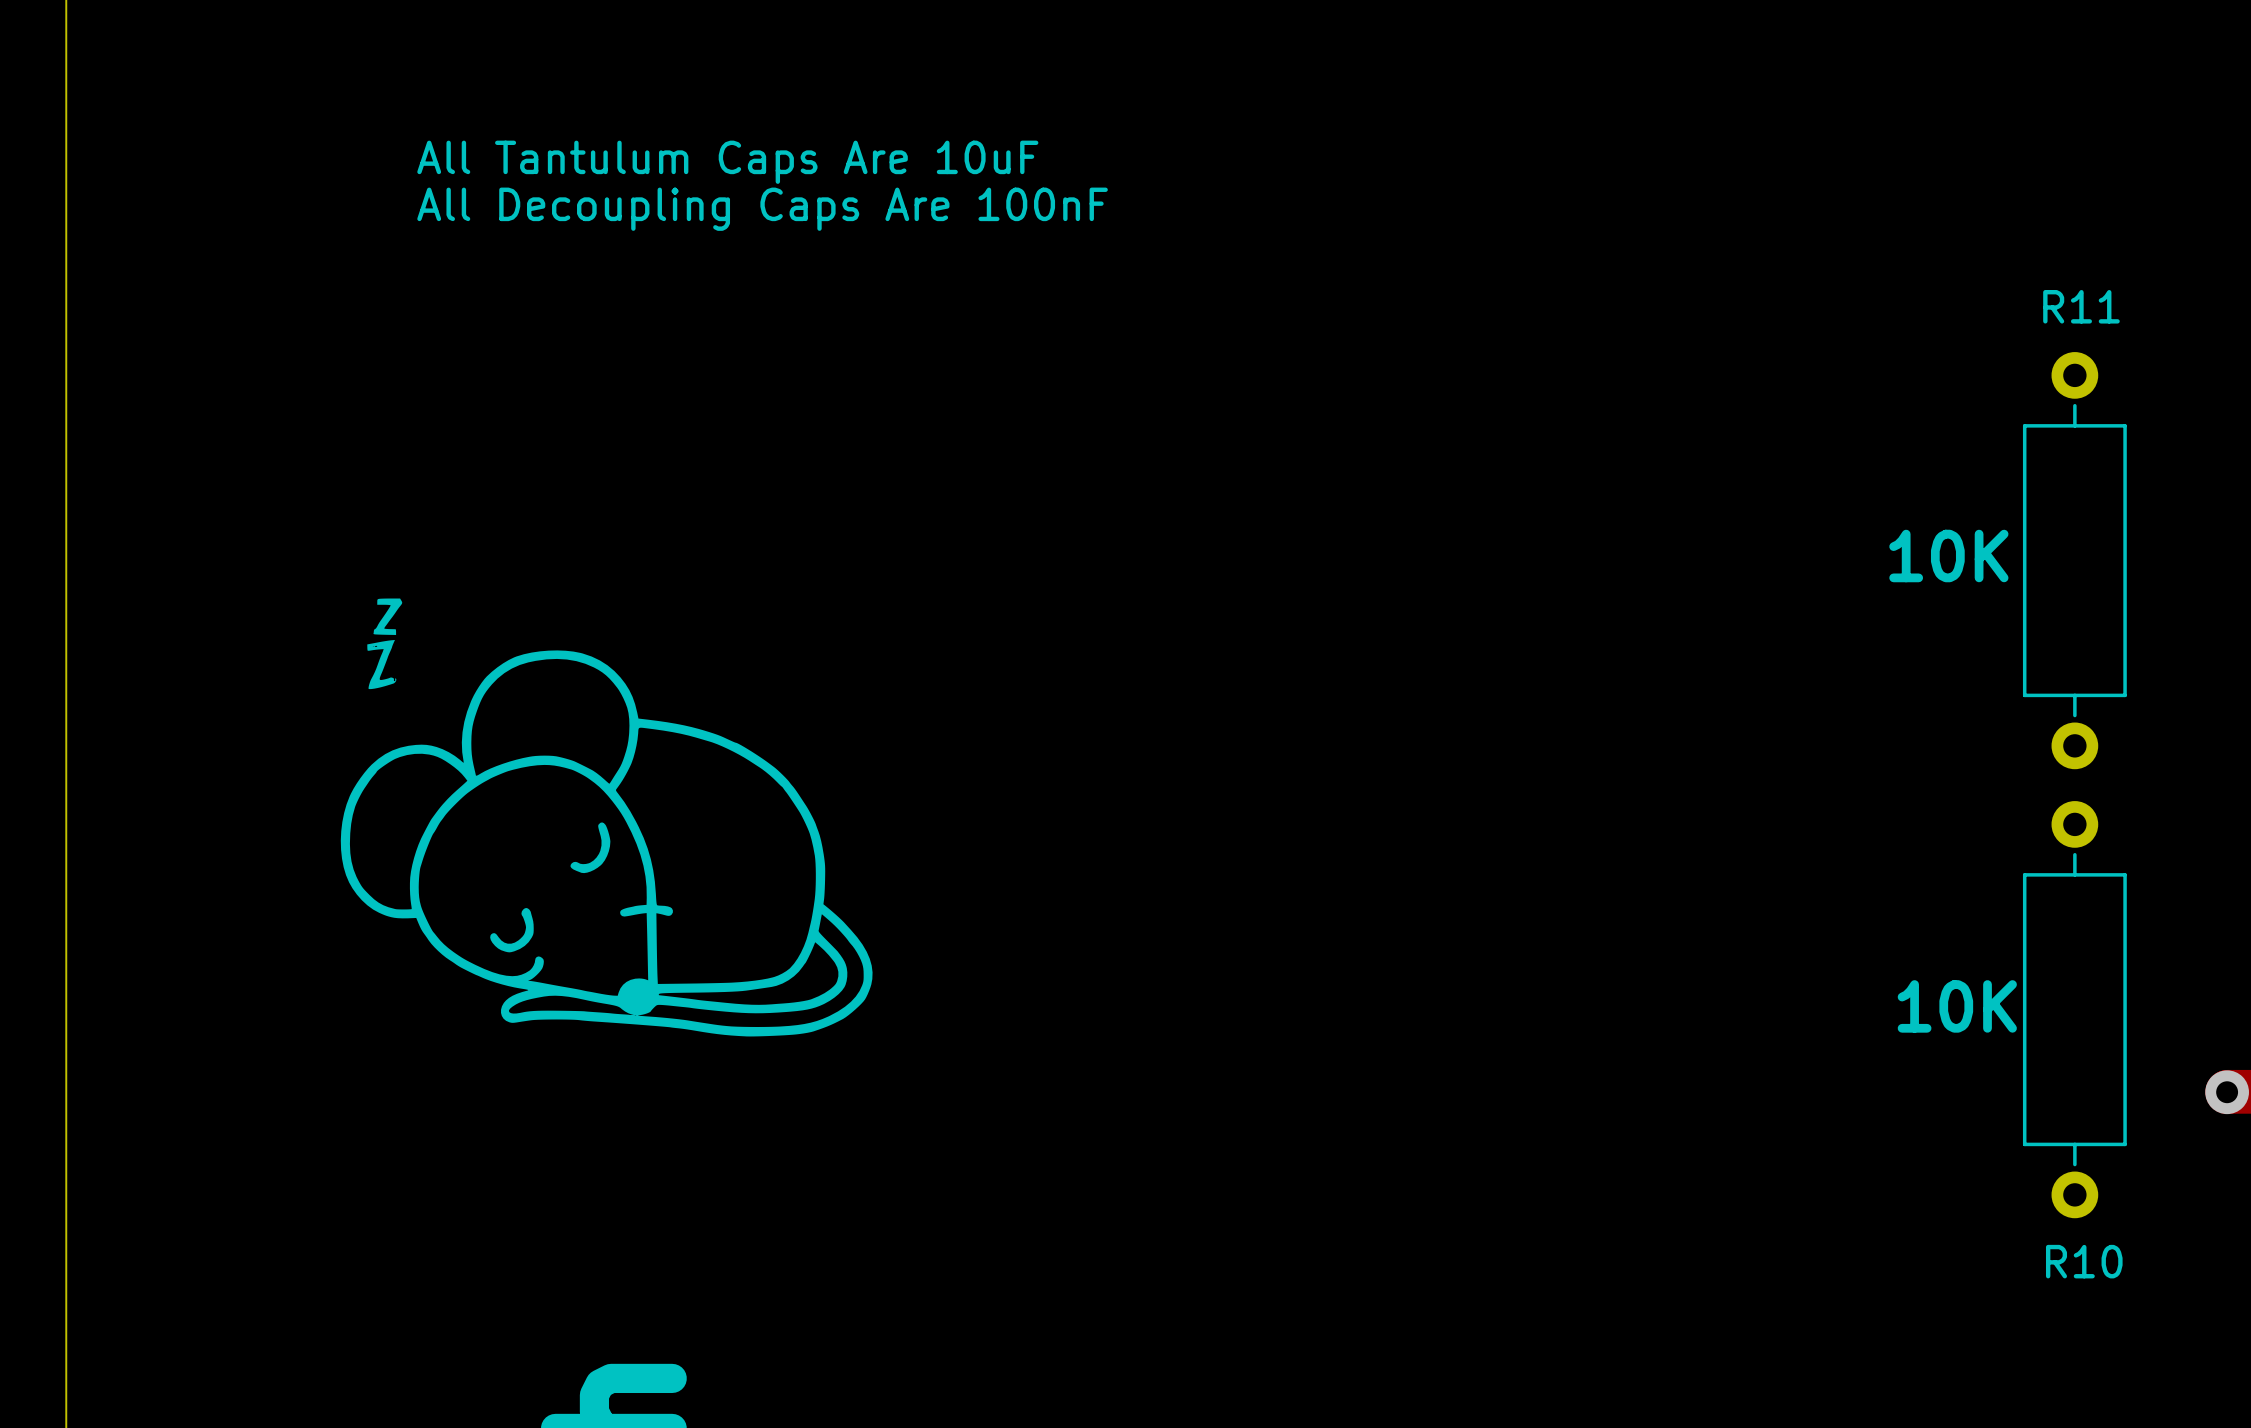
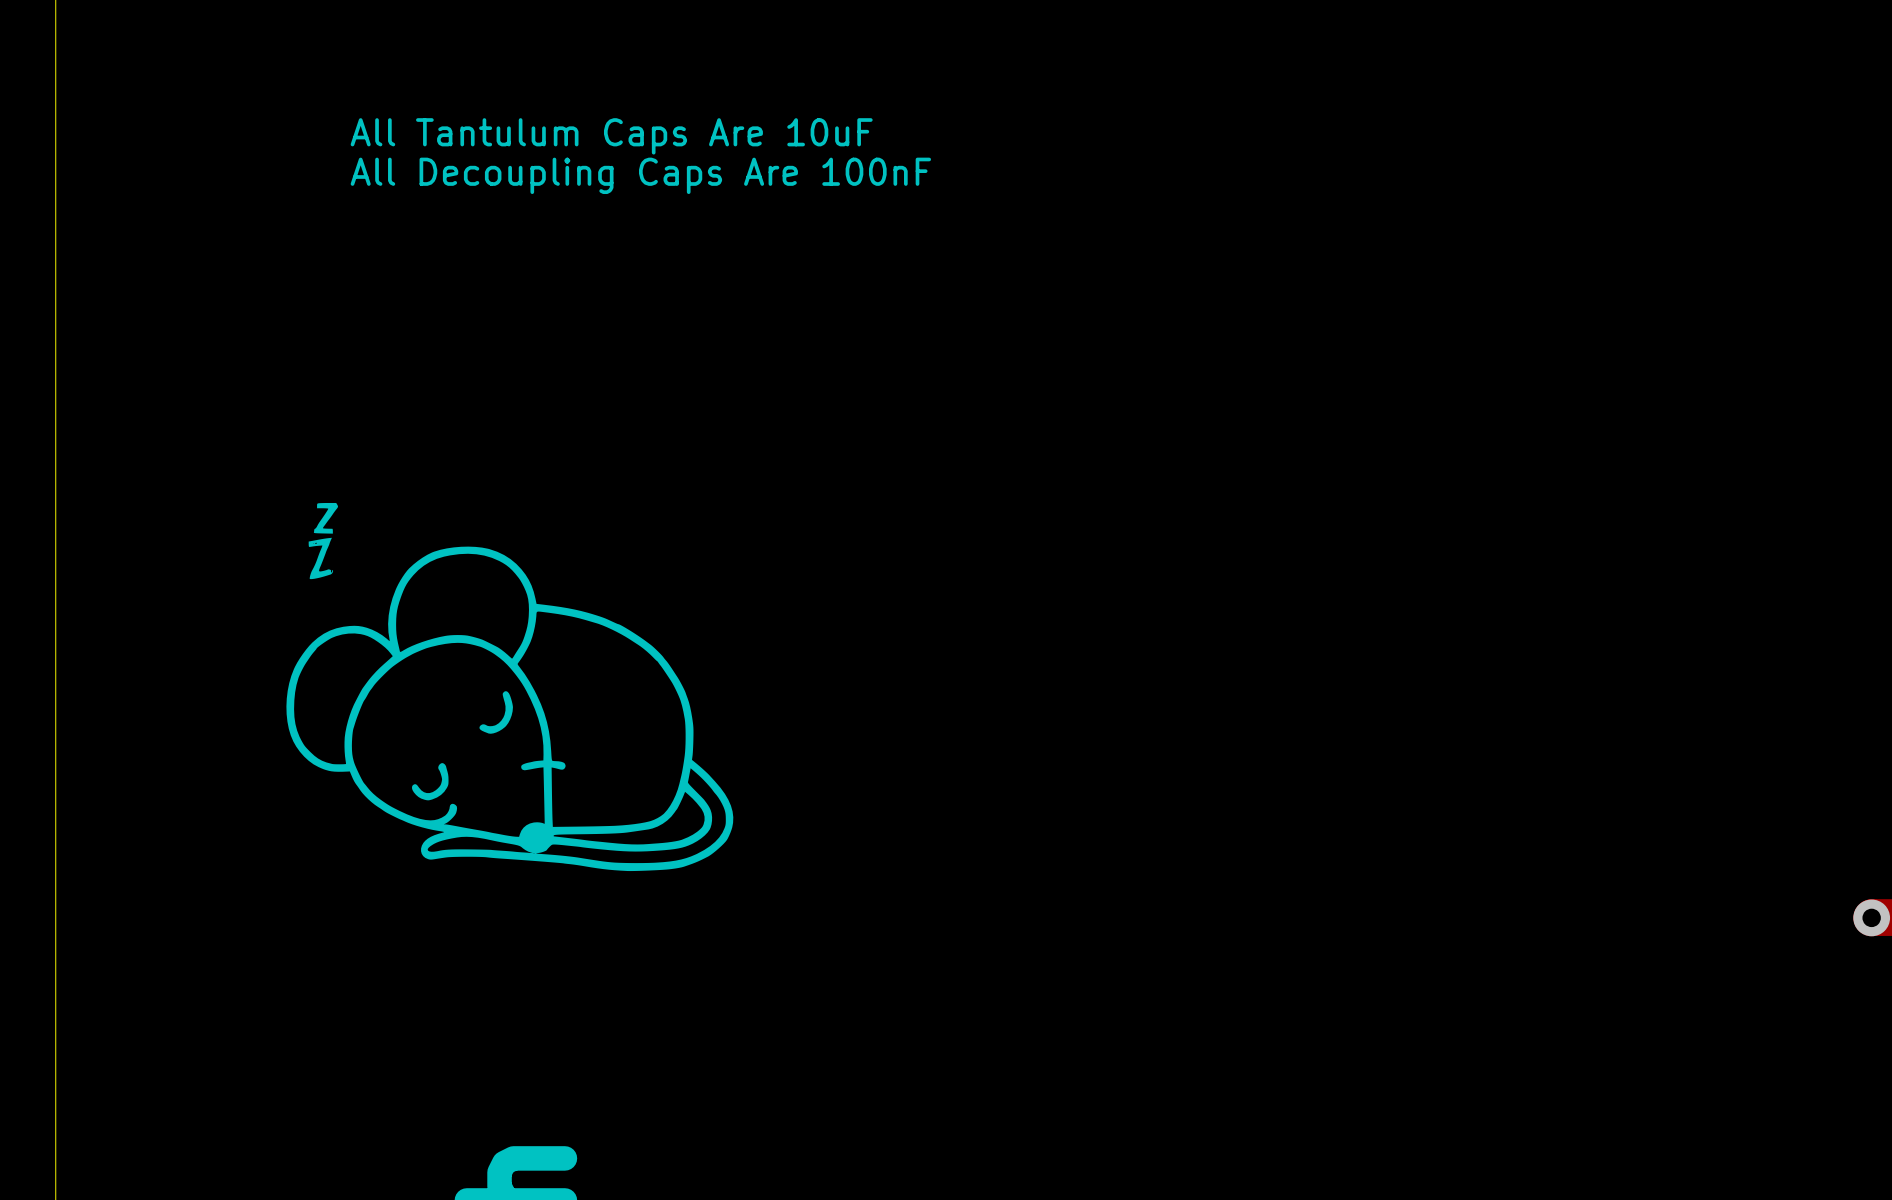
R11: 10K (2074, 560) -> none
R10: 10K (2074, 1009) -> none

